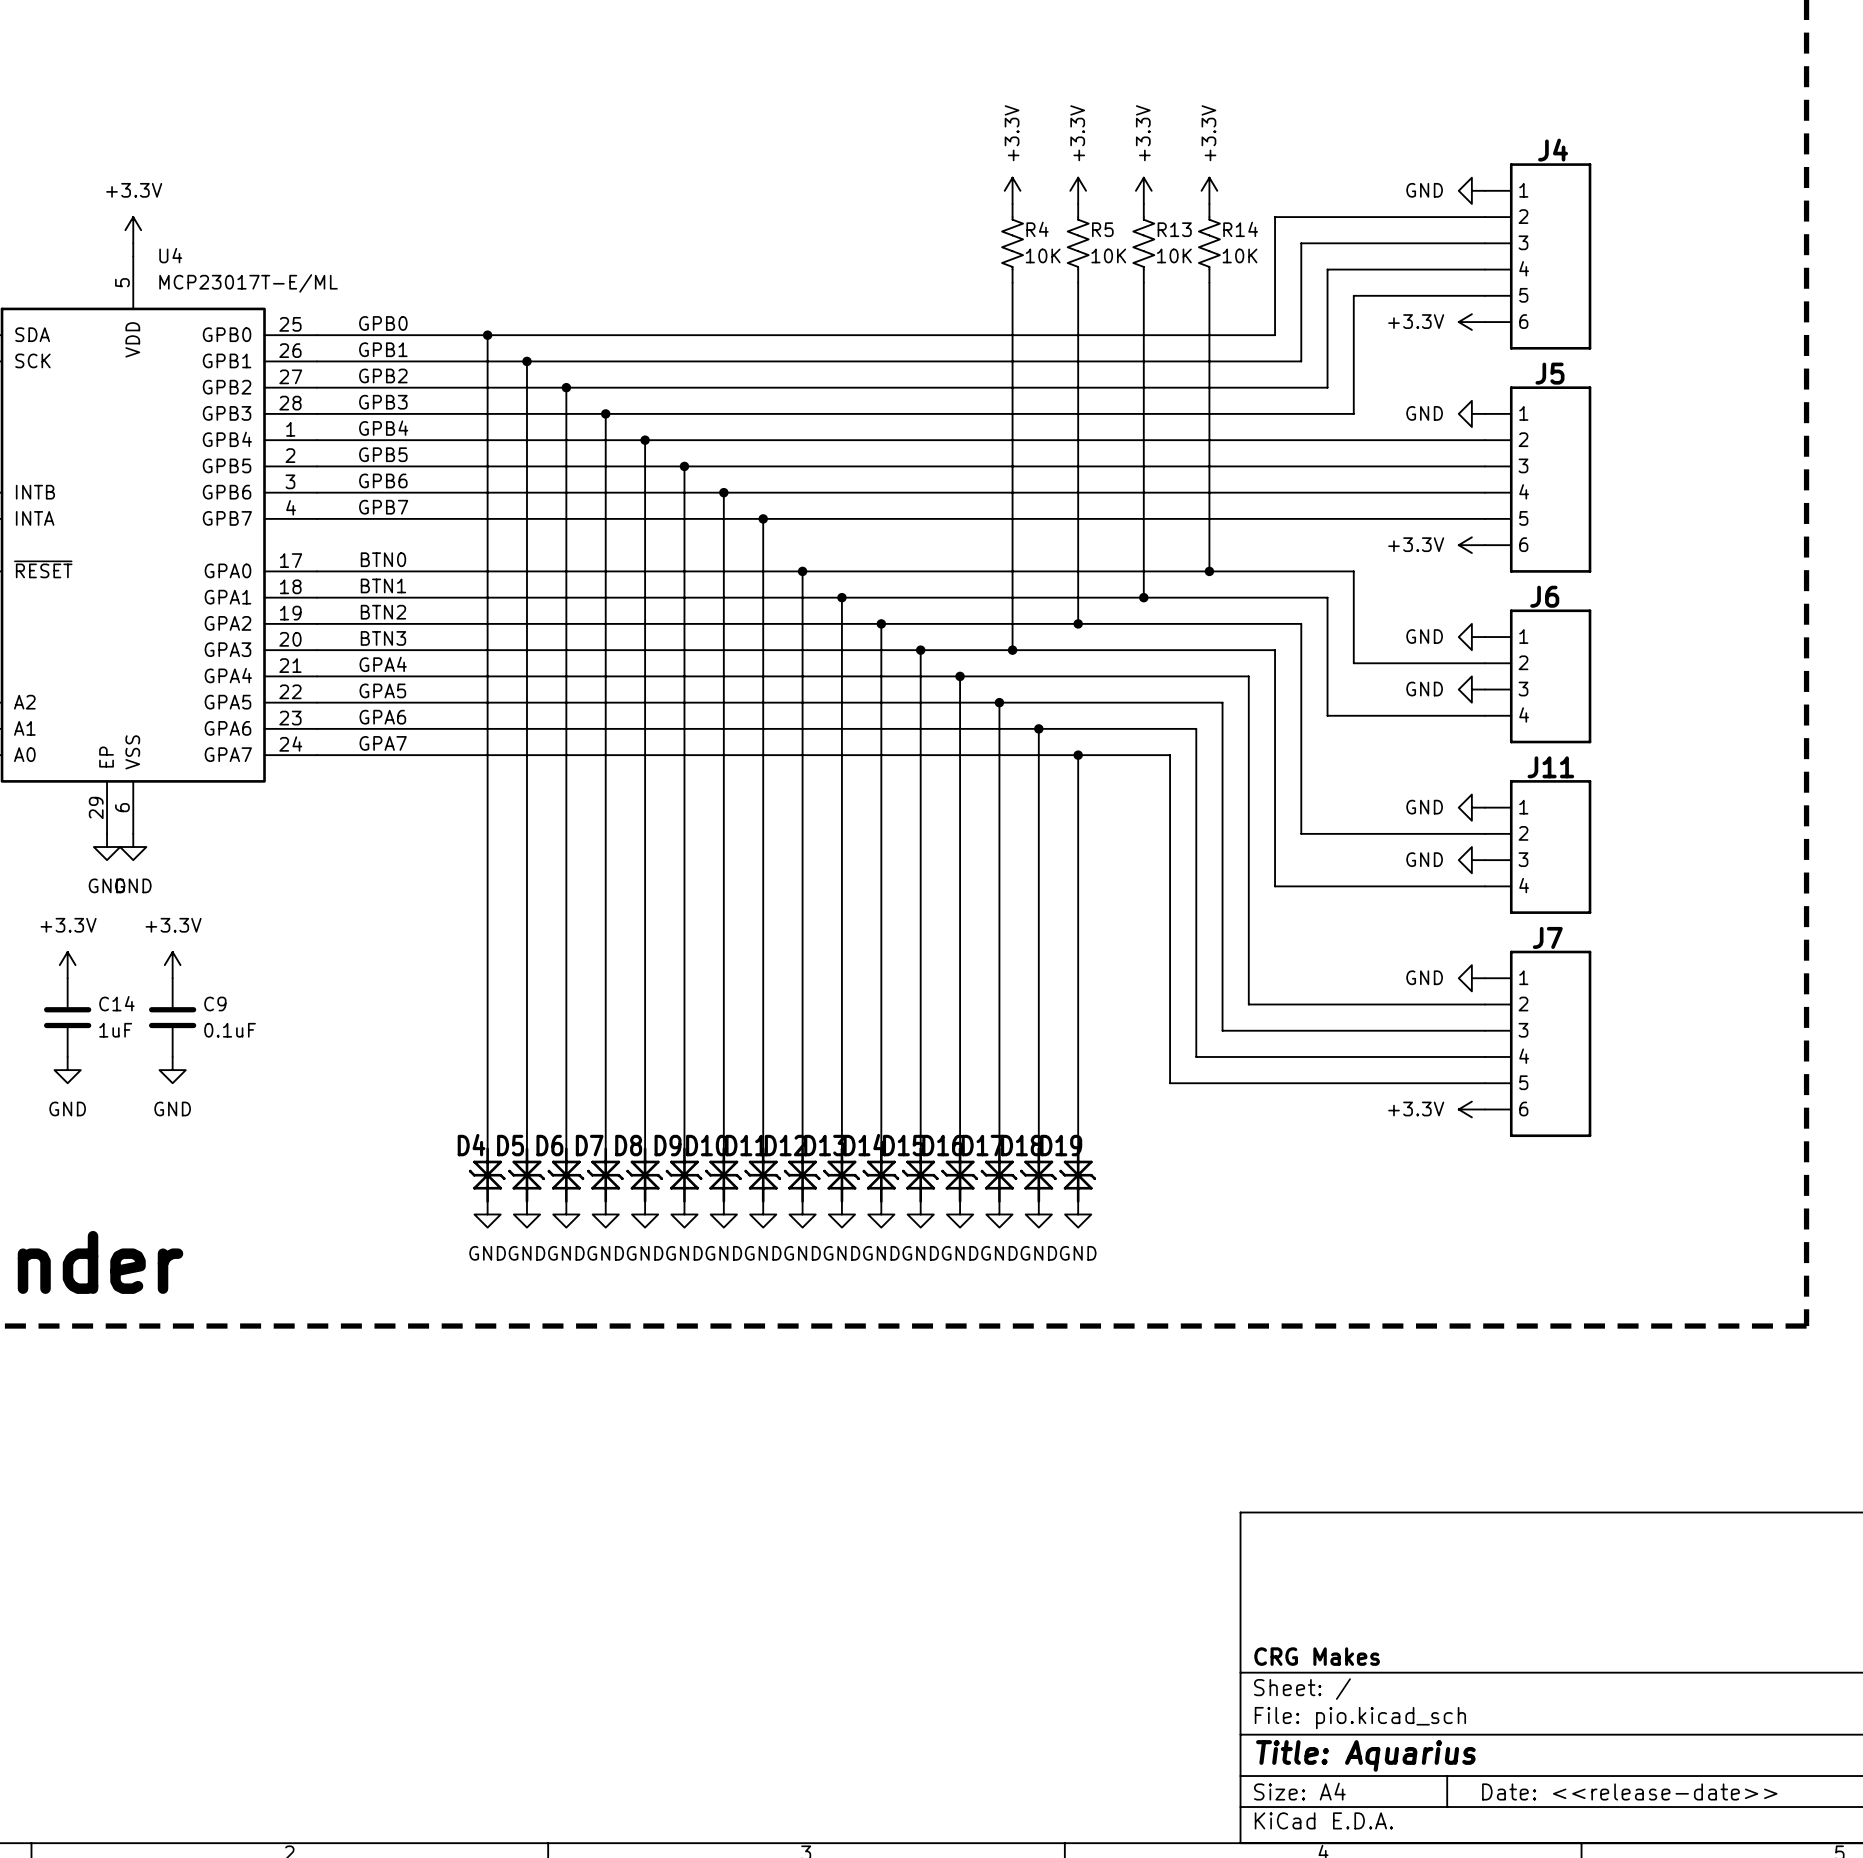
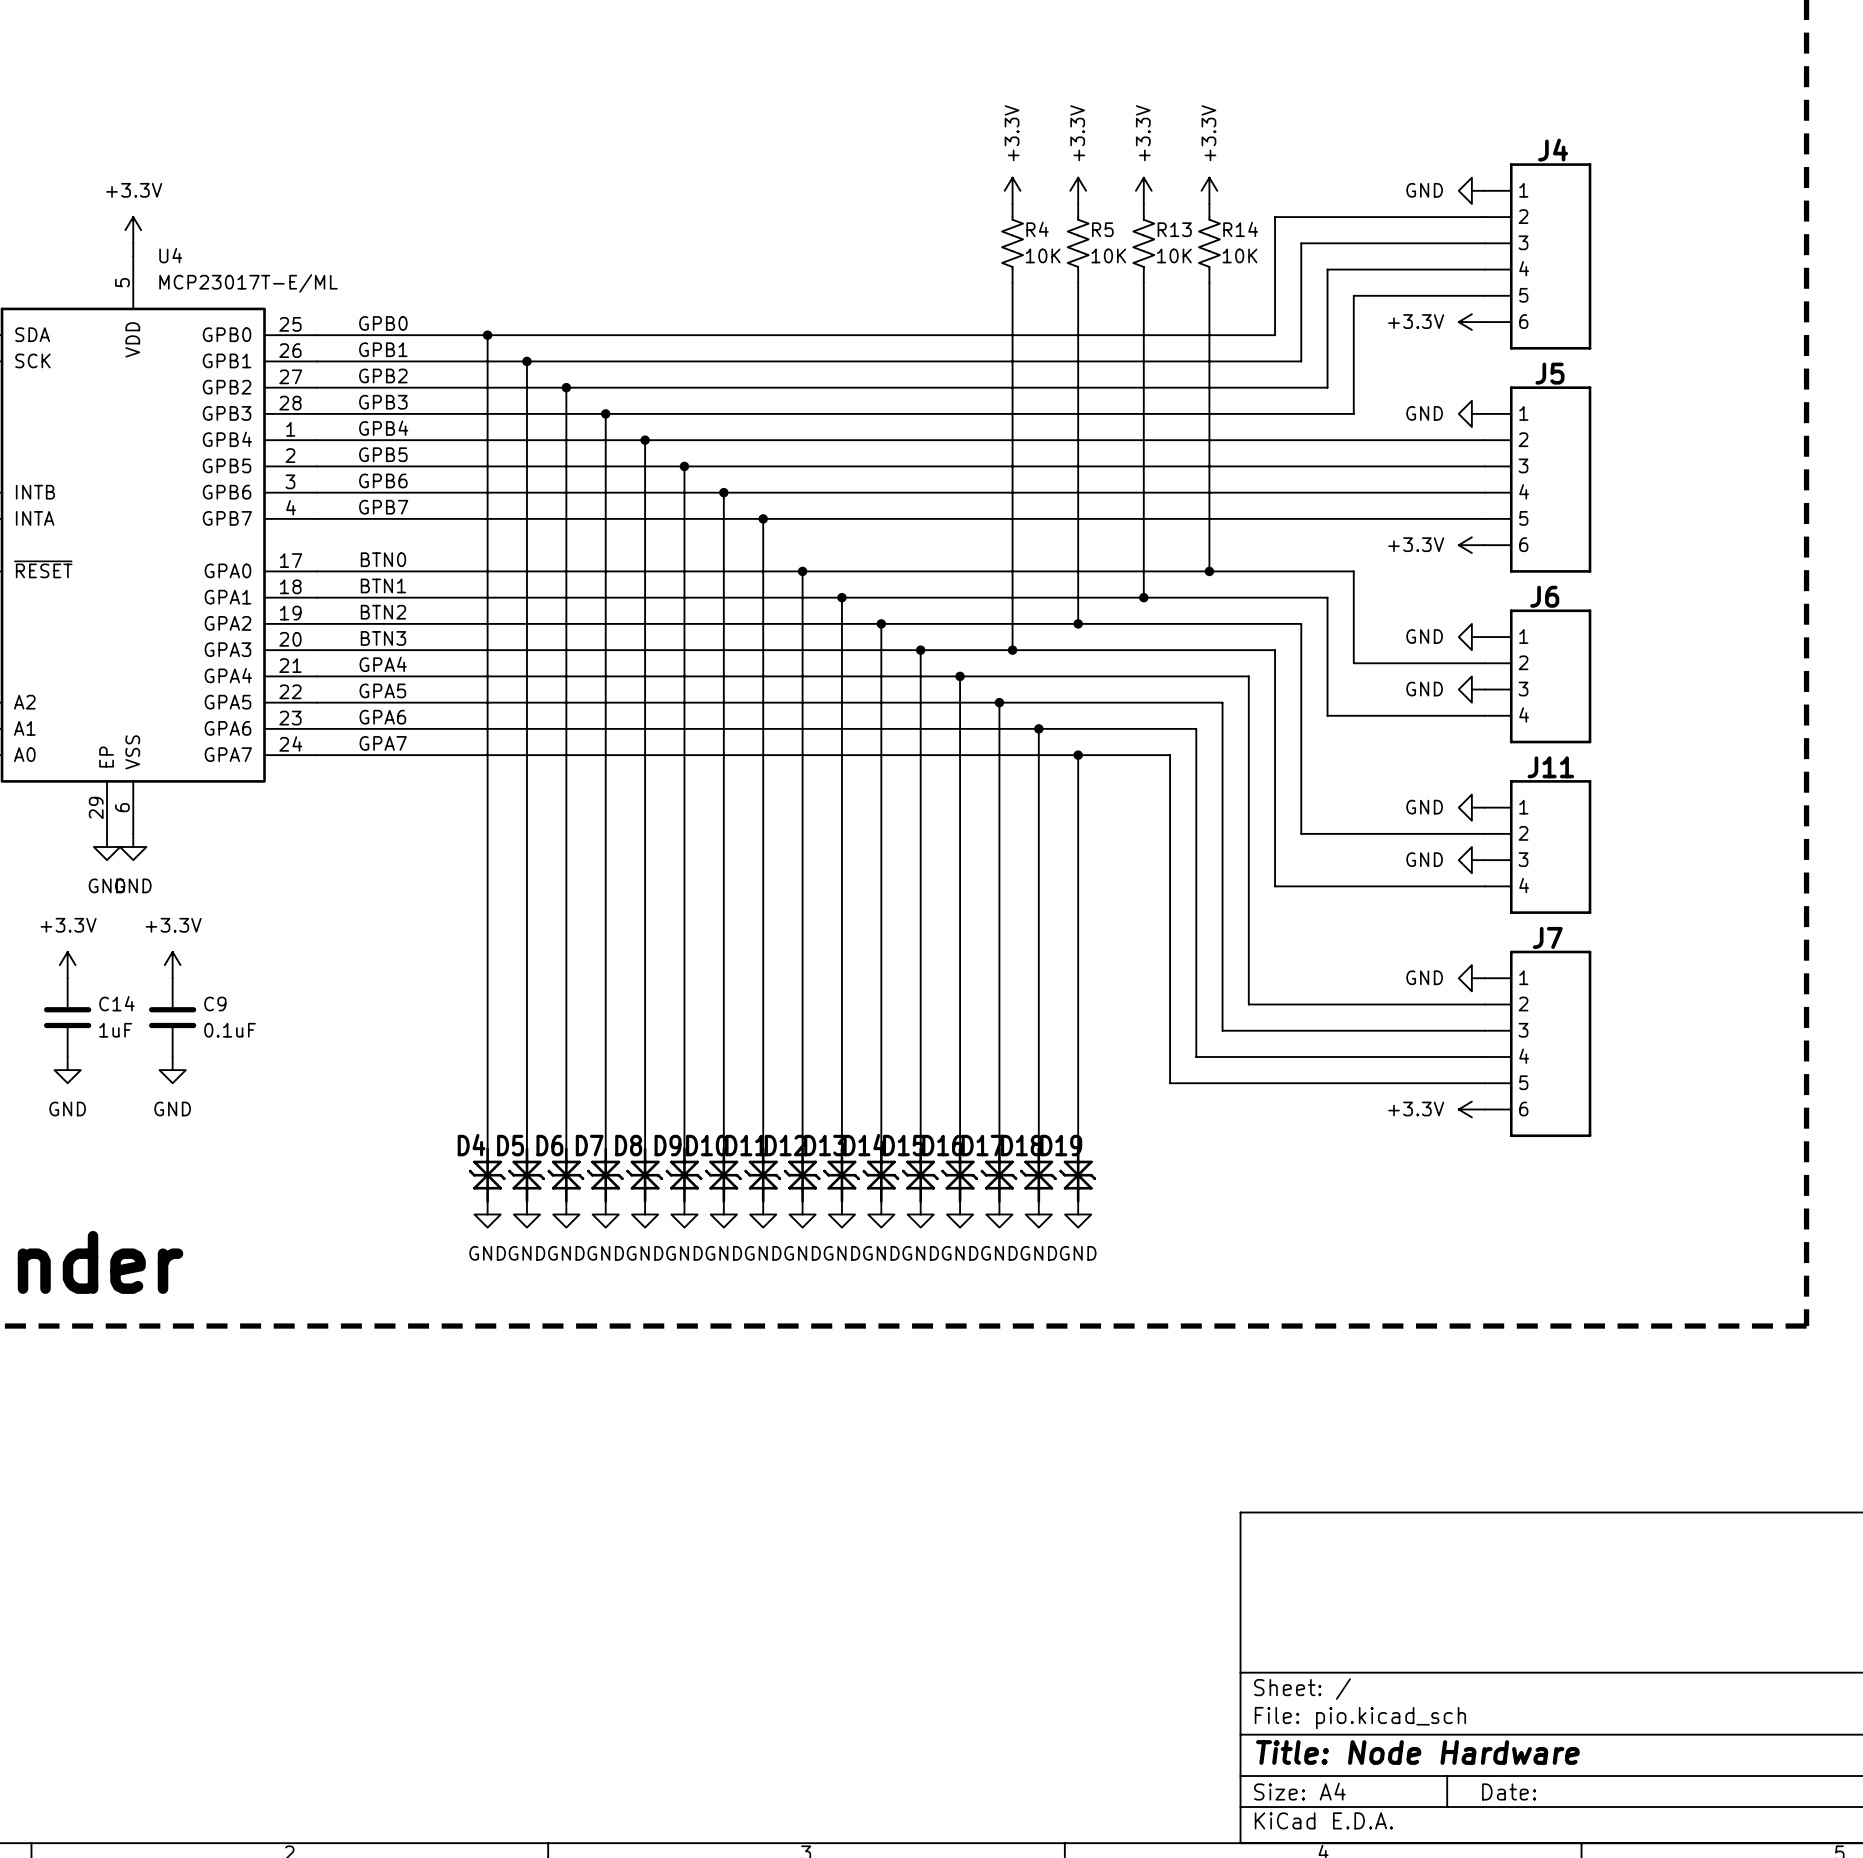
title block: CRG Makes (1317, 1656) -> none
title block: Title: Aquarius (1365, 1755) -> Title: Node Hardware (1417, 1752)
title block: Date: <<release-date>> (1629, 1791) -> Date: (1509, 1791)

